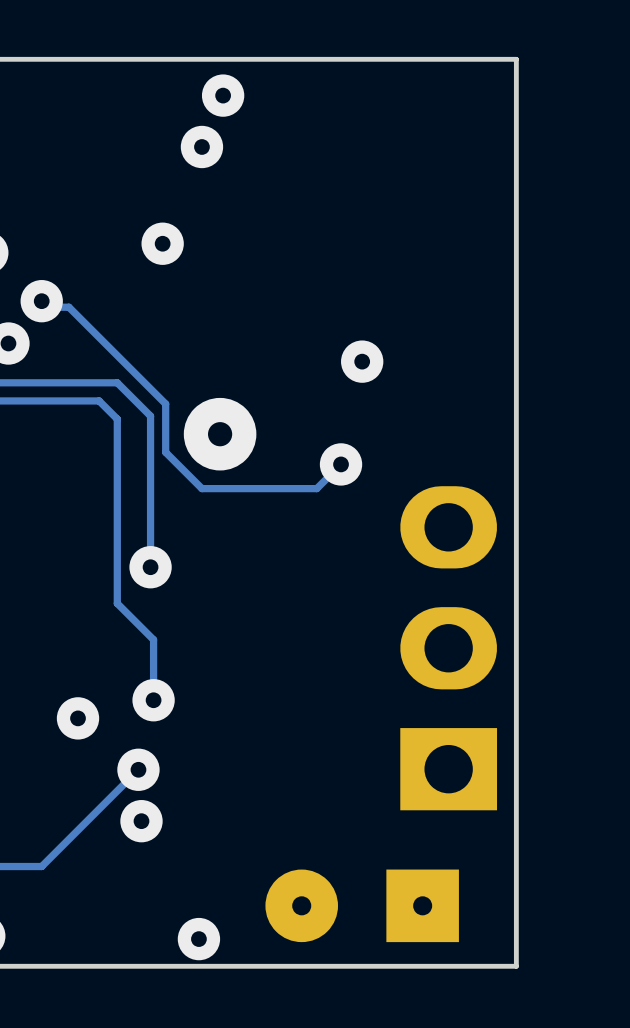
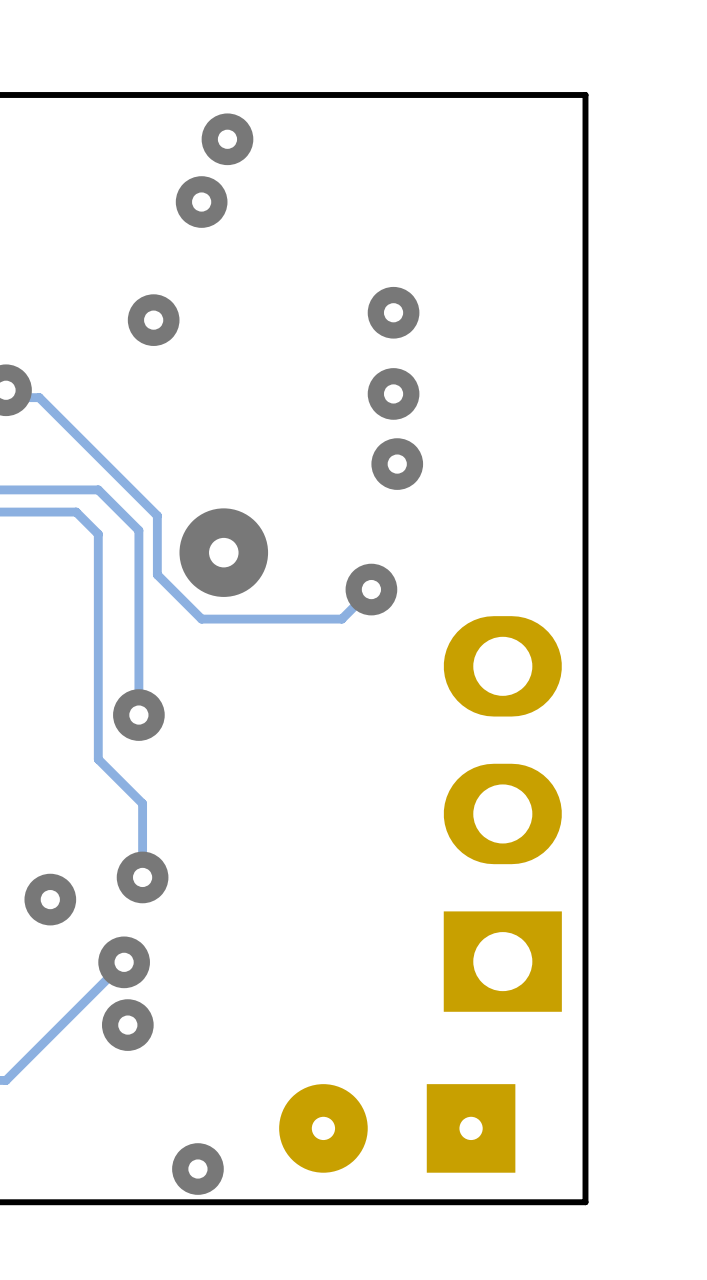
via: none -> (393, 312)
via: none -> (393, 393)

